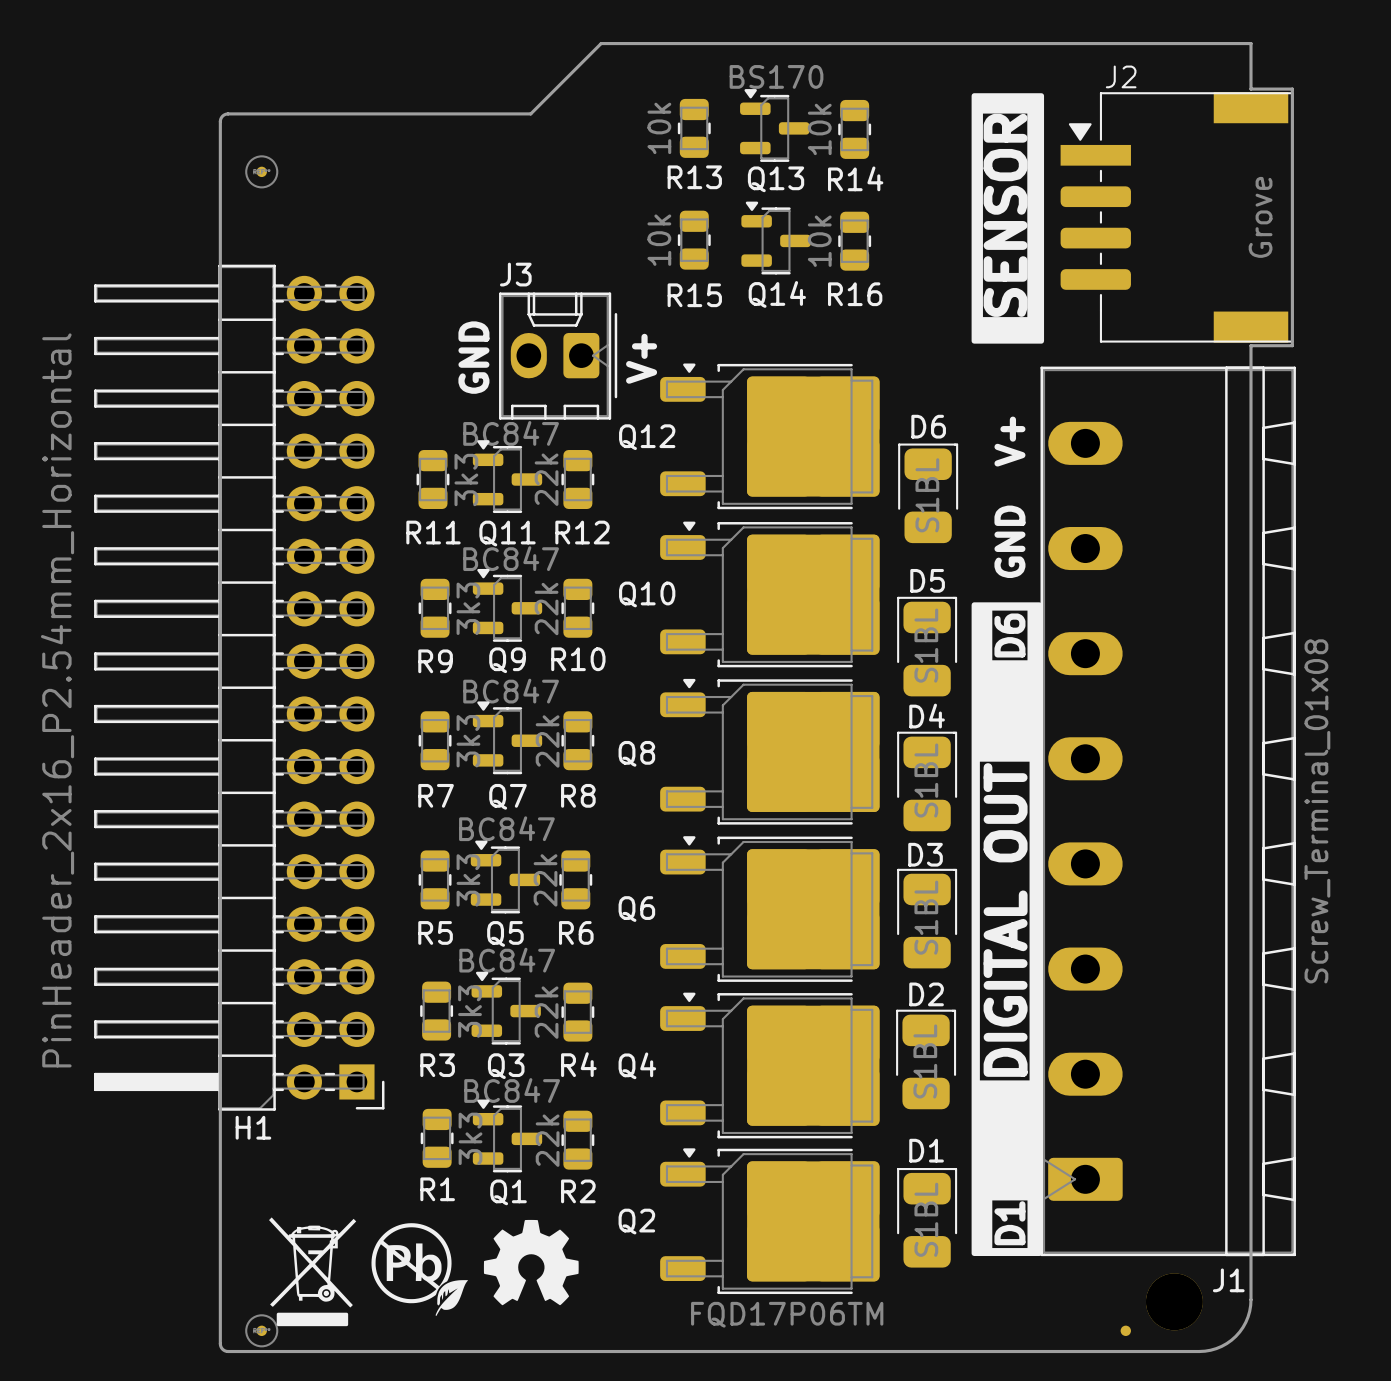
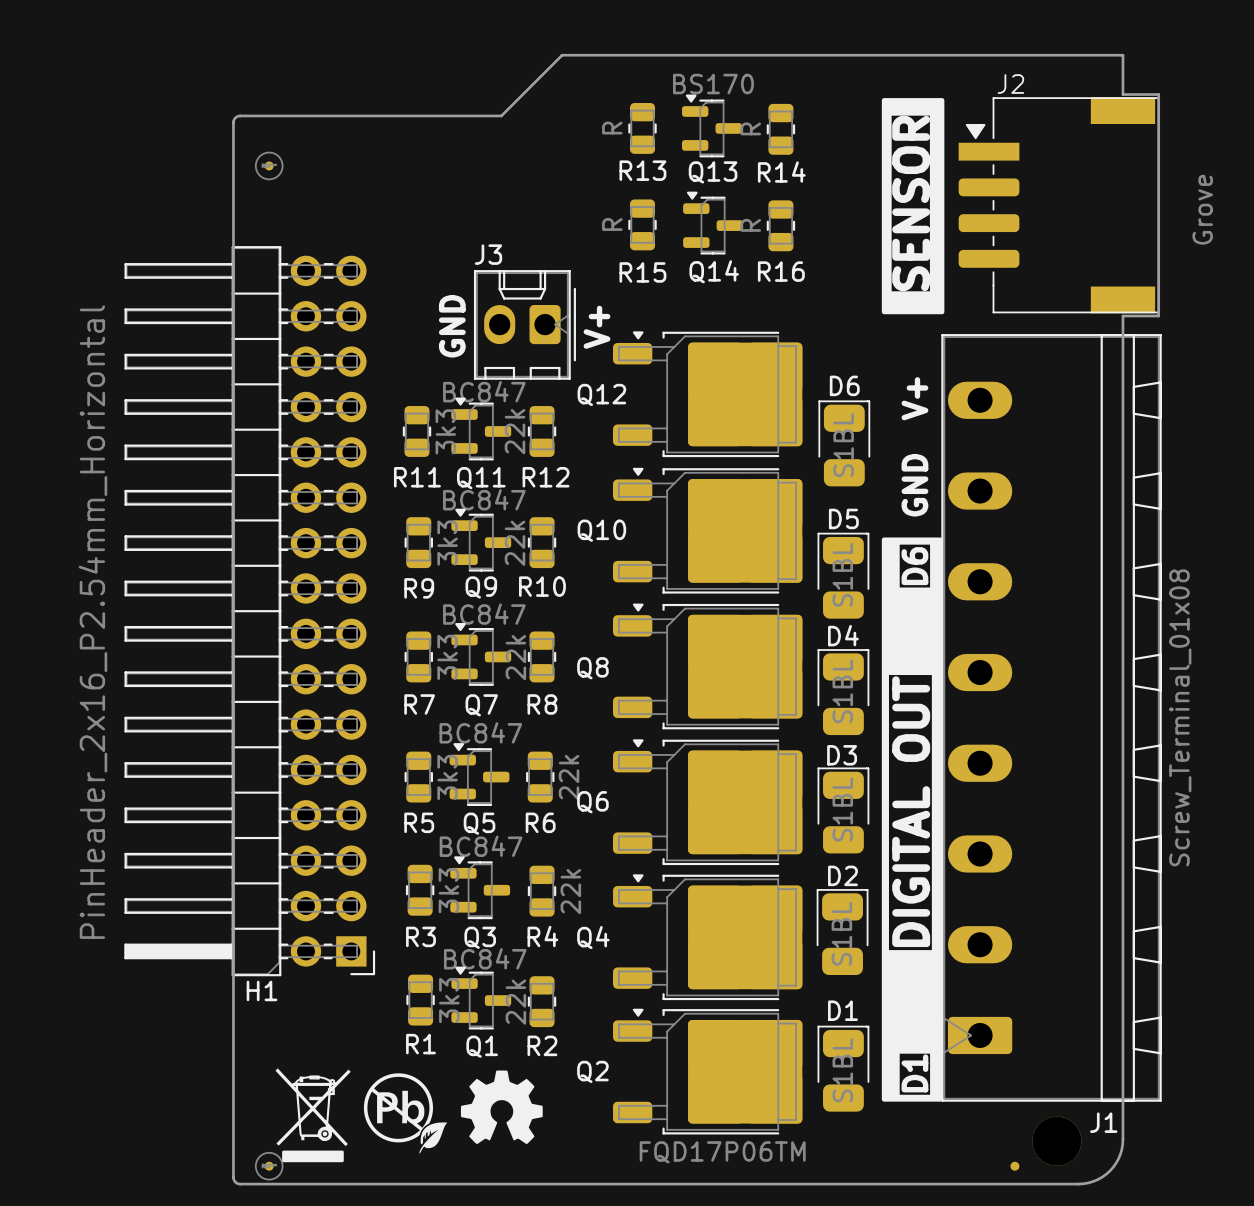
R13 value: 10k (659, 128) -> R (612, 128)
R14 value: 10k (819, 129) -> R (750, 128)
J2 value position: Grove (1260, 217) -> Grove (1202, 209)
R15 value: 10k (659, 240) -> R (612, 224)
R16 value: 10k (819, 241) -> R (750, 225)
R6 value position: 22k (545, 880) -> 22k (569, 777)
R4 value position: 22k (546, 1012) -> 22k (570, 891)

